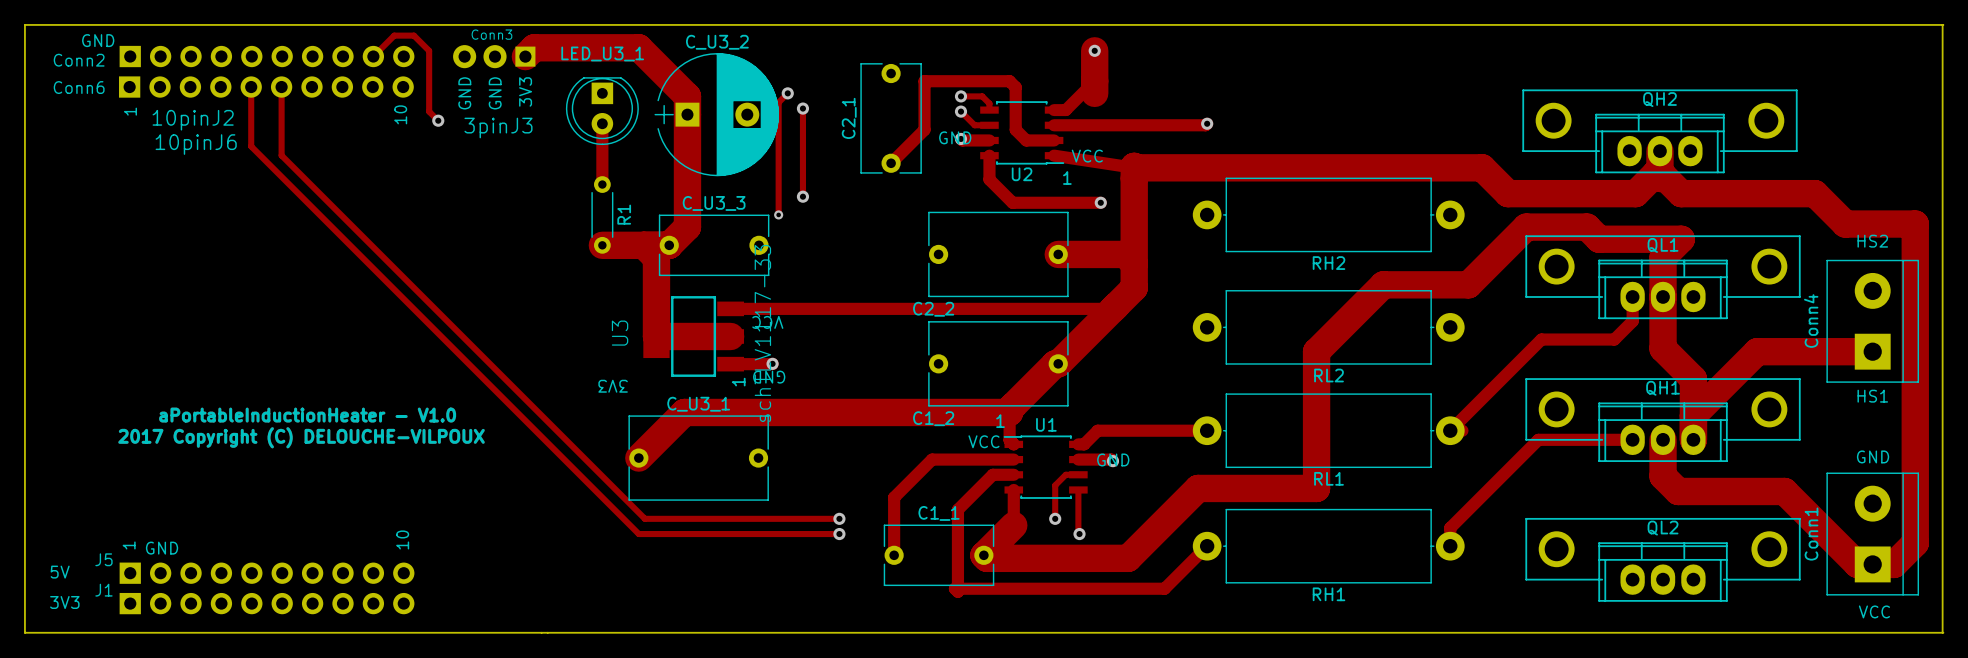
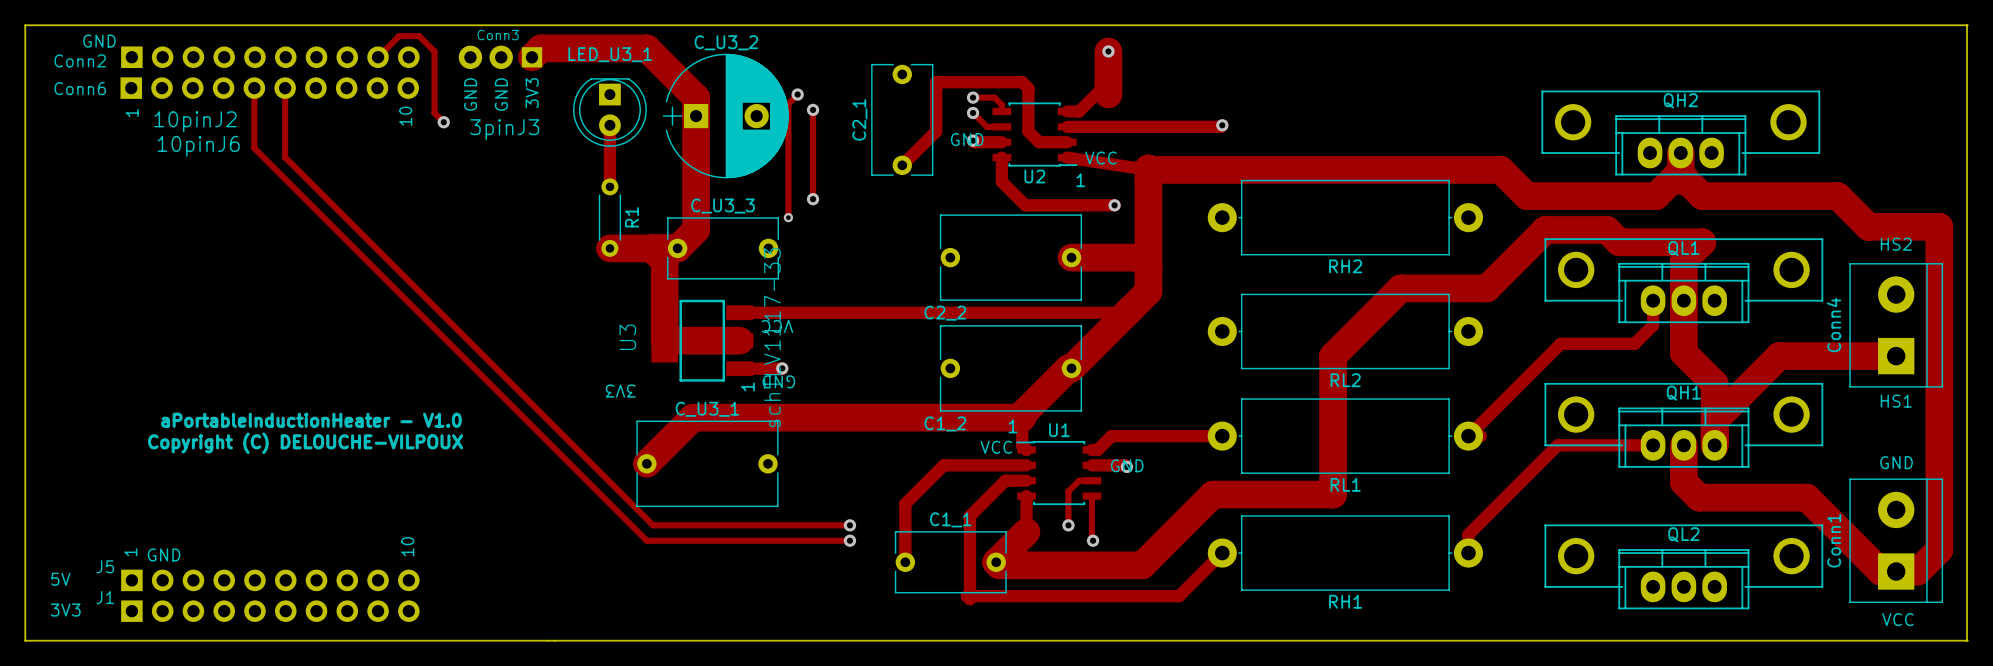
text: 2017 Copyright (C) DELOUCHE-VILPOUX (301, 437) -> none
text: none -> Copyright (C) DELOUCHE-VILPOUX (305, 443)

